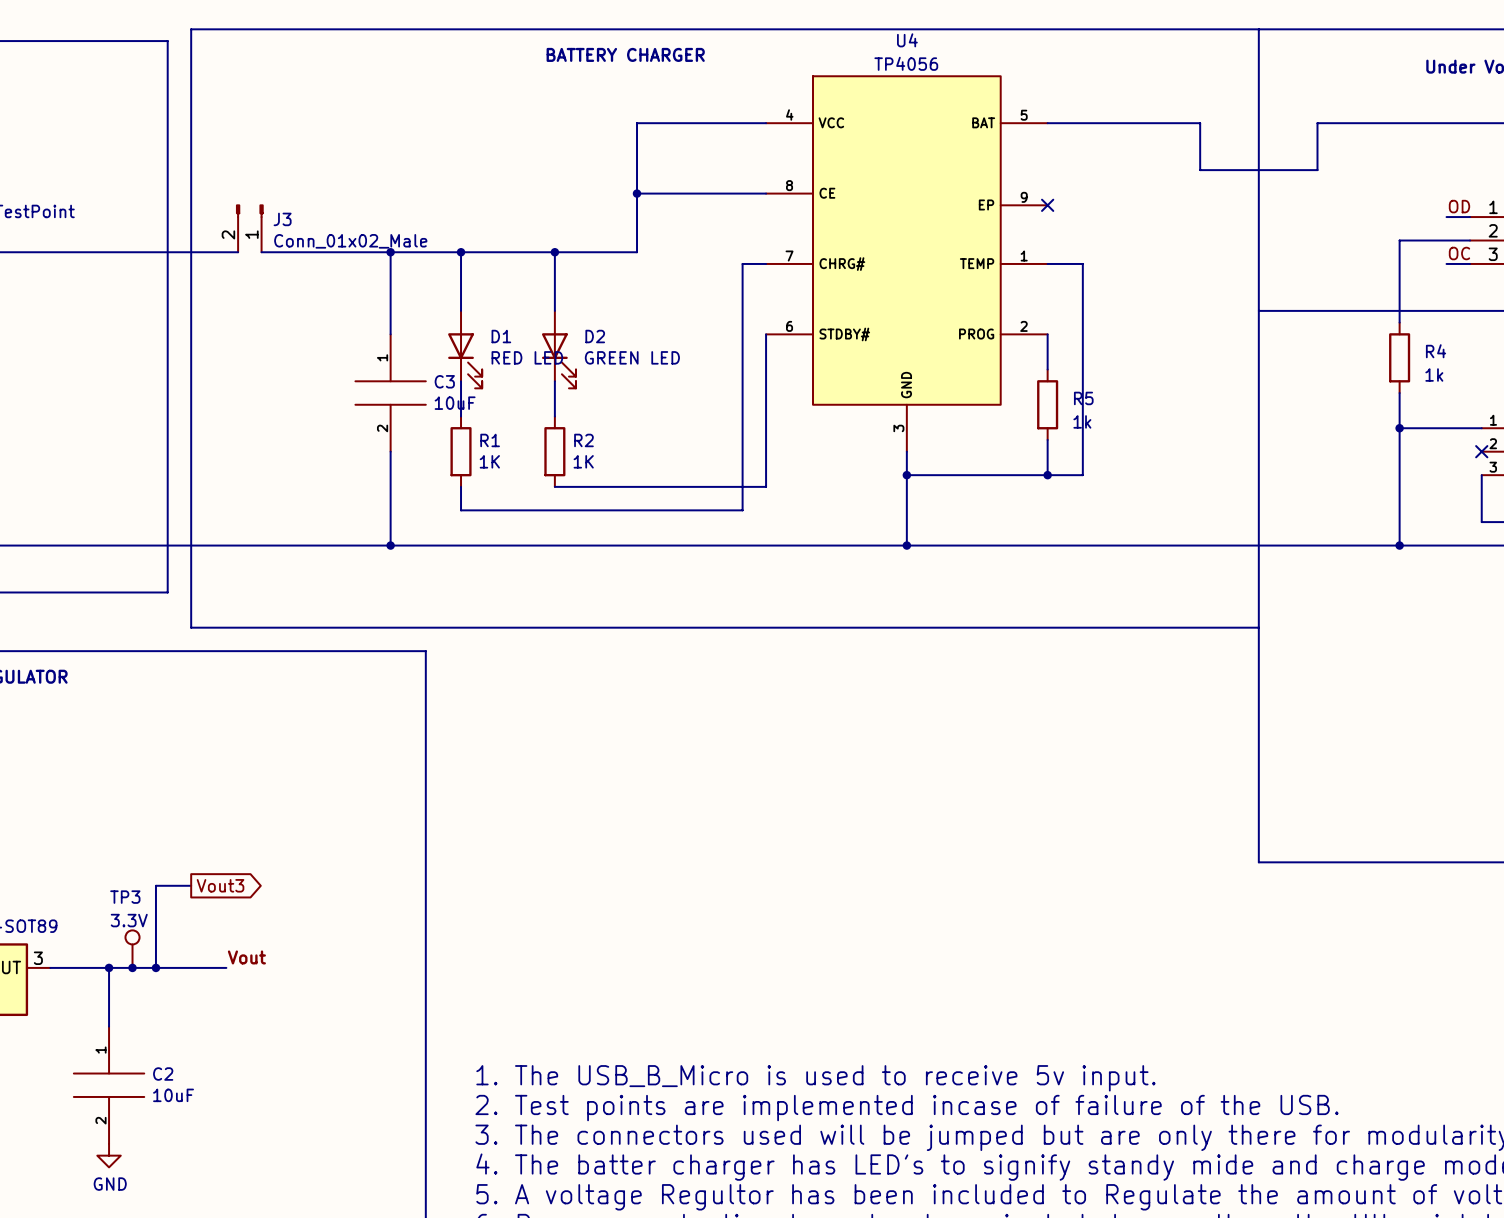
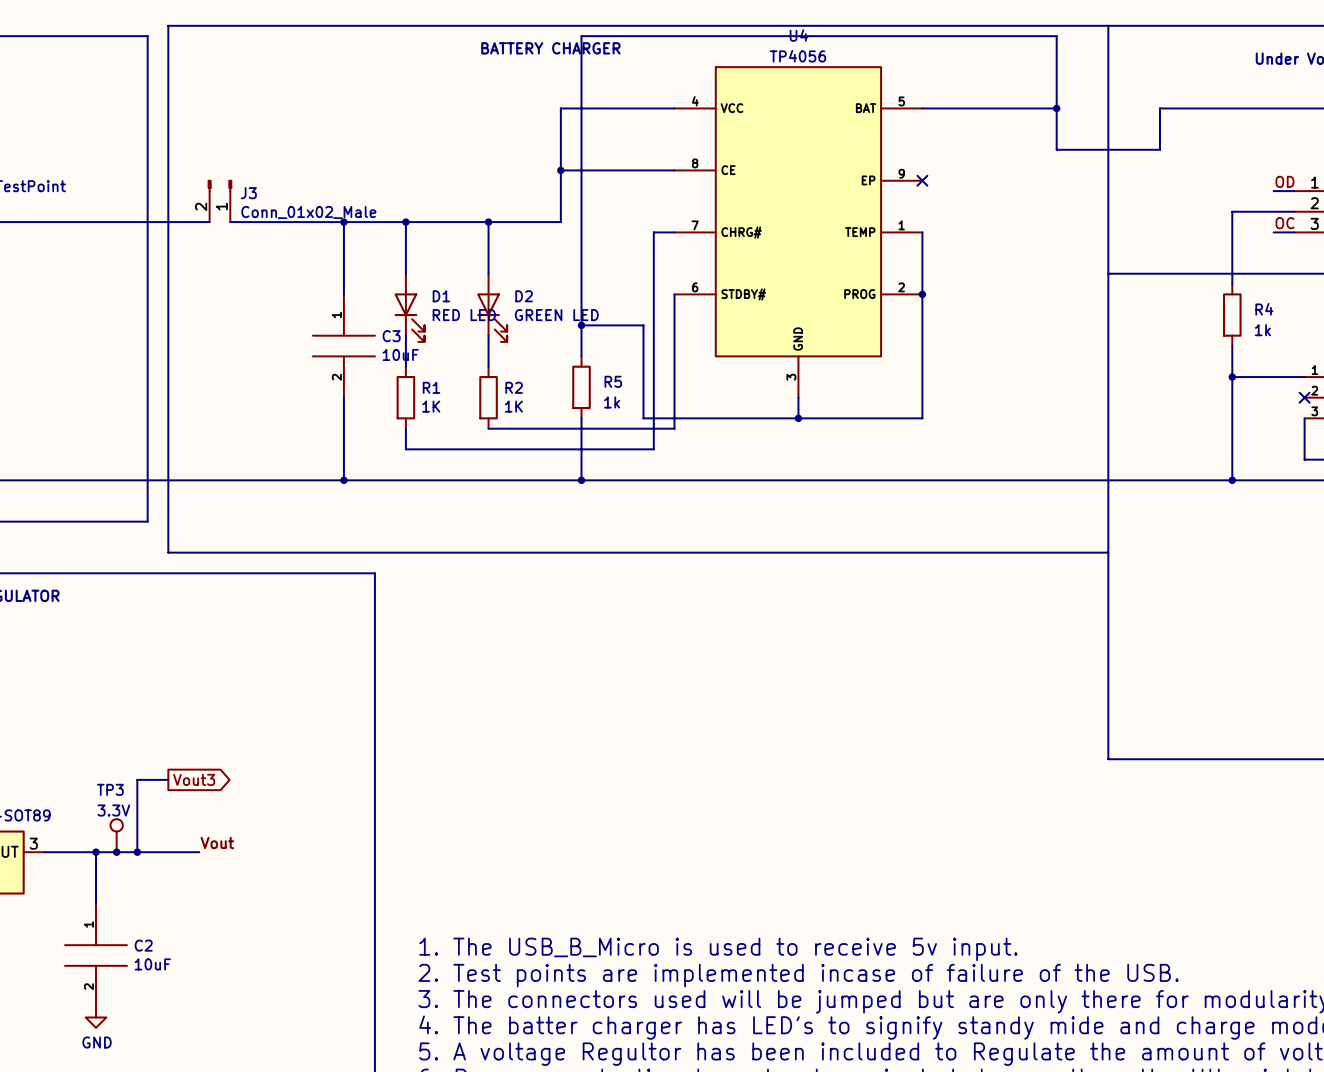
wire: none -> (1056, 108) (1056, 36) (581, 36) (581, 356)
junction: none -> (1056, 108)
wire: (1047, 263) (1082, 263) (1082, 475) (1047, 475) -> (922, 232) (922, 294)
junction: none -> (922, 294)
junction: none -> (581, 325)
wire: none -> (922, 325) (922, 387)
R5 position: (1047, 404) -> (581, 387)
wire: none -> (581, 418) (581, 480)
wire: (906, 475) (906, 545) -> (798, 418) (643, 418) (643, 325) (581, 325)
junction: (1047, 475) -> none
junction: none -> (581, 480)
junction: (906, 545) -> none

